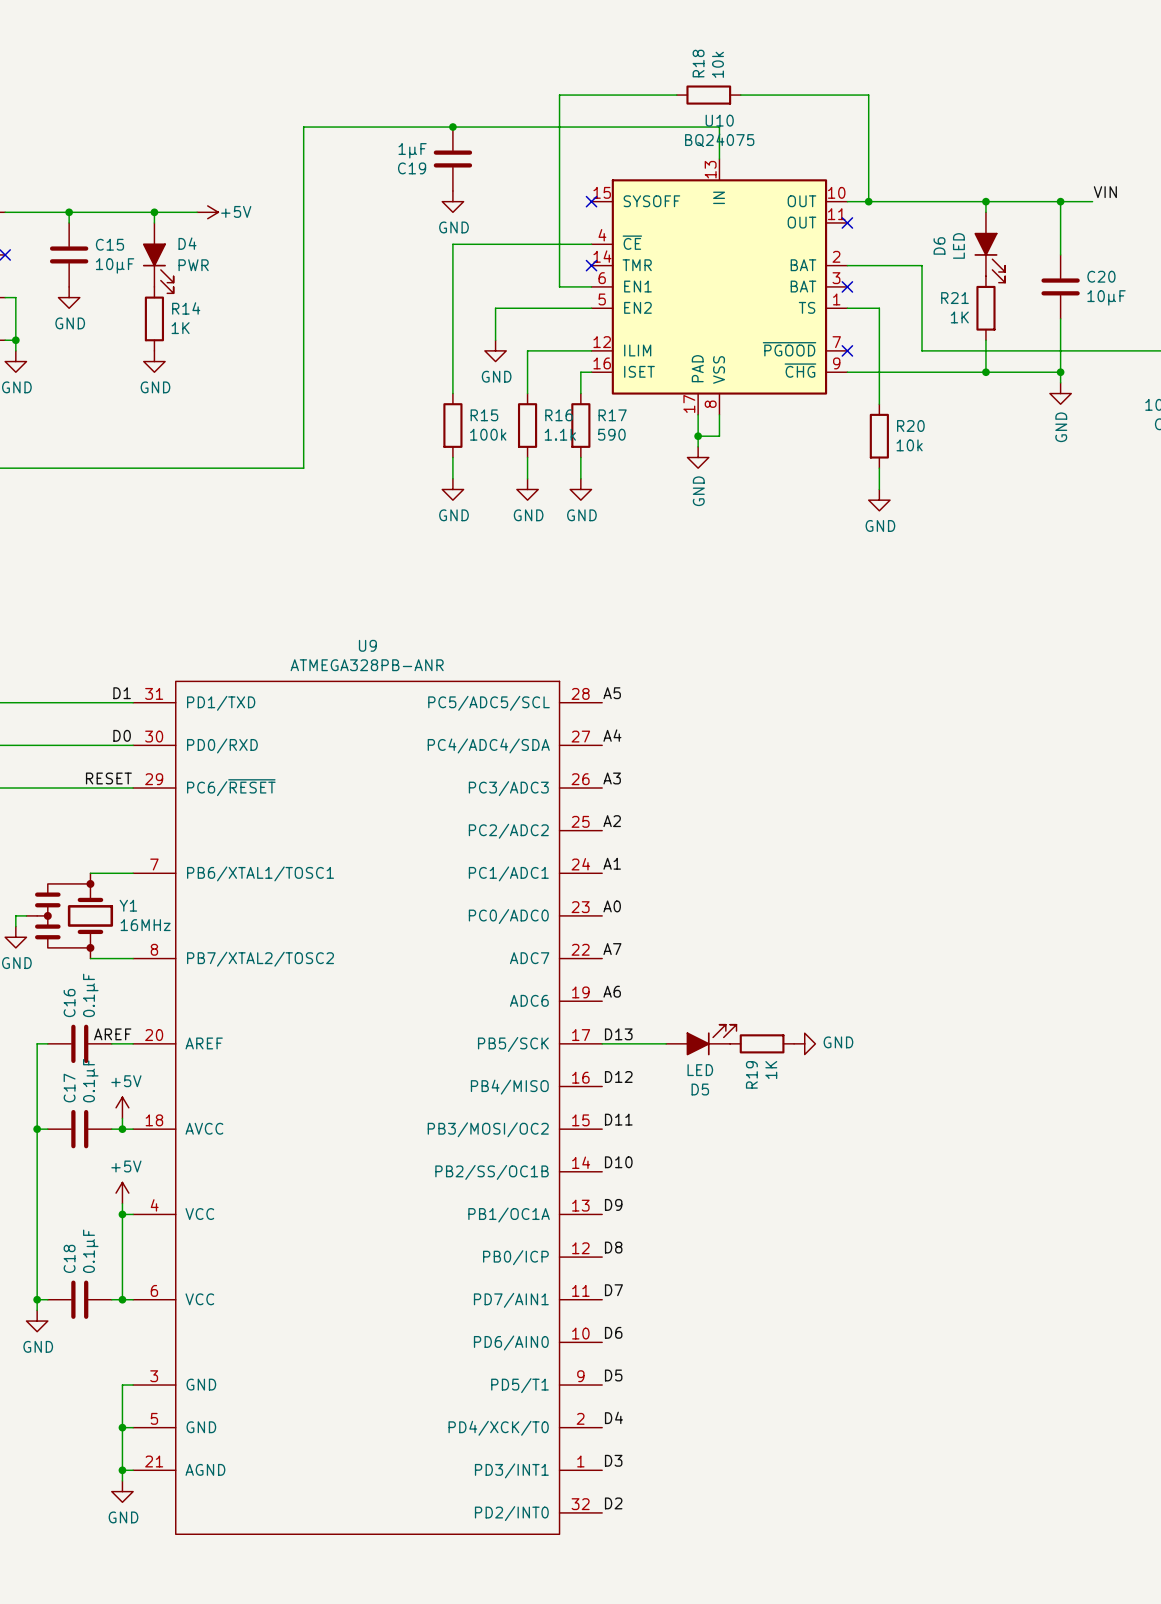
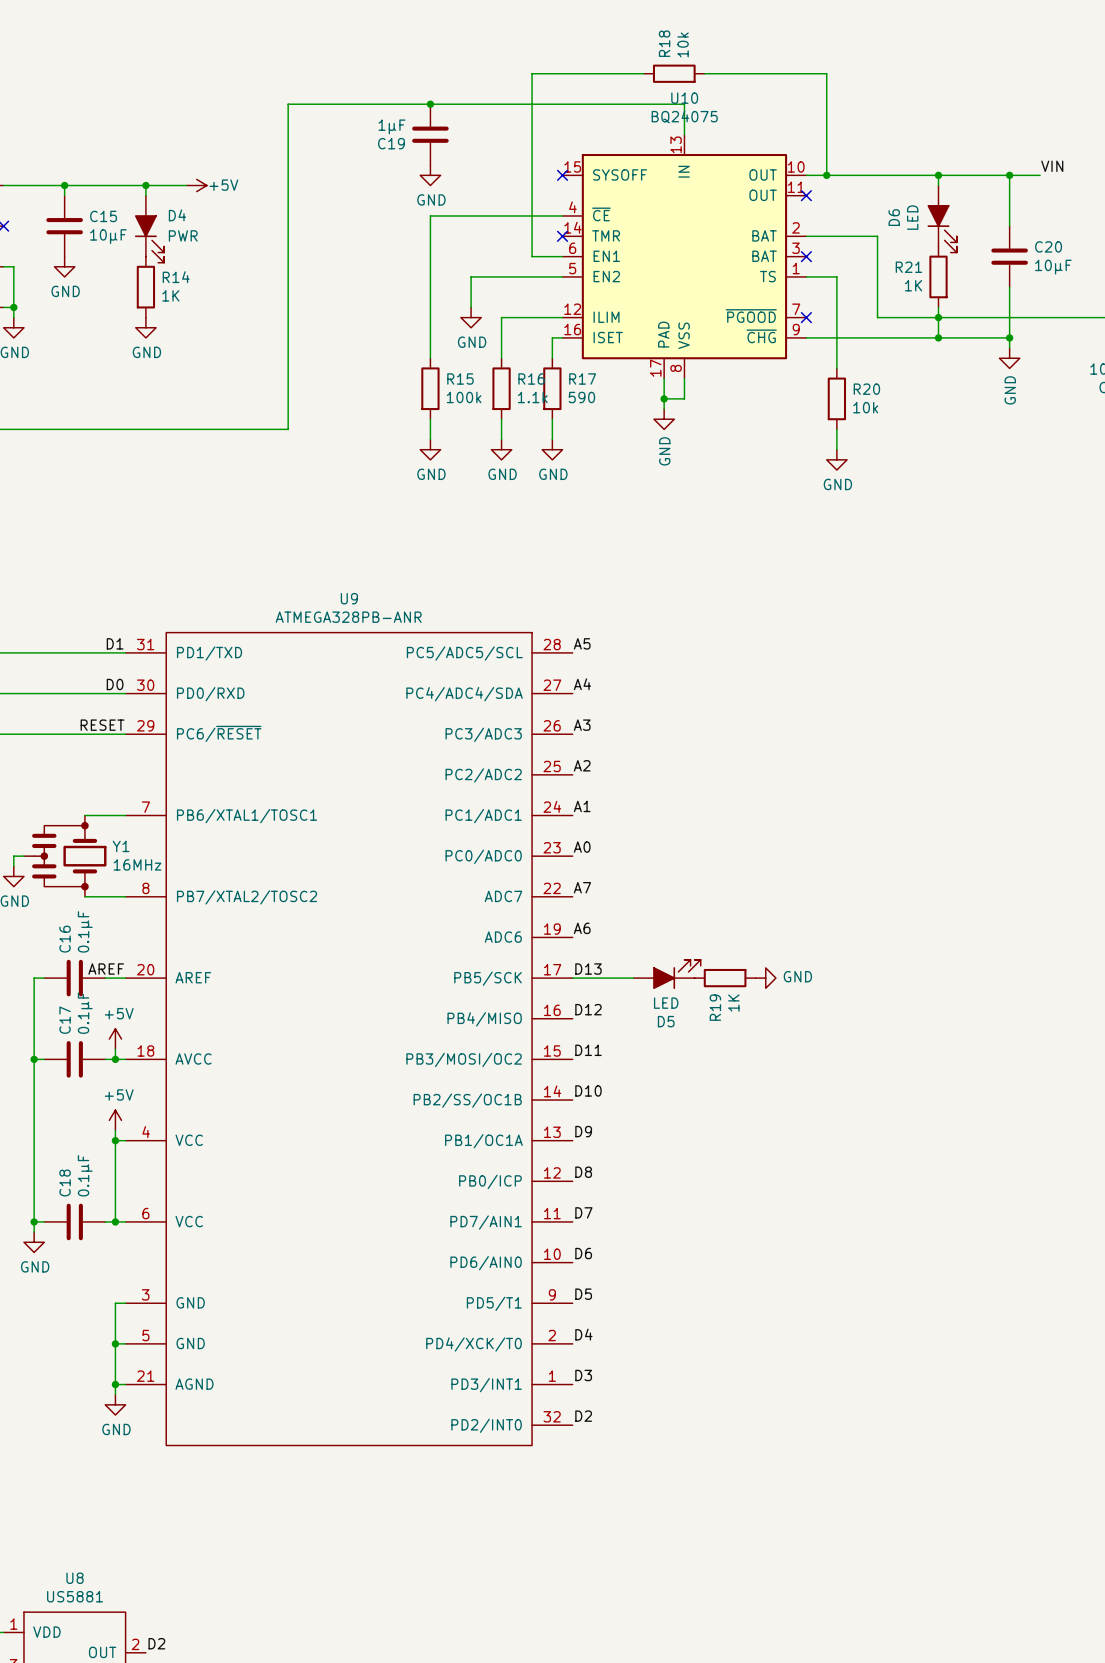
junction: none -> (938, 317)

